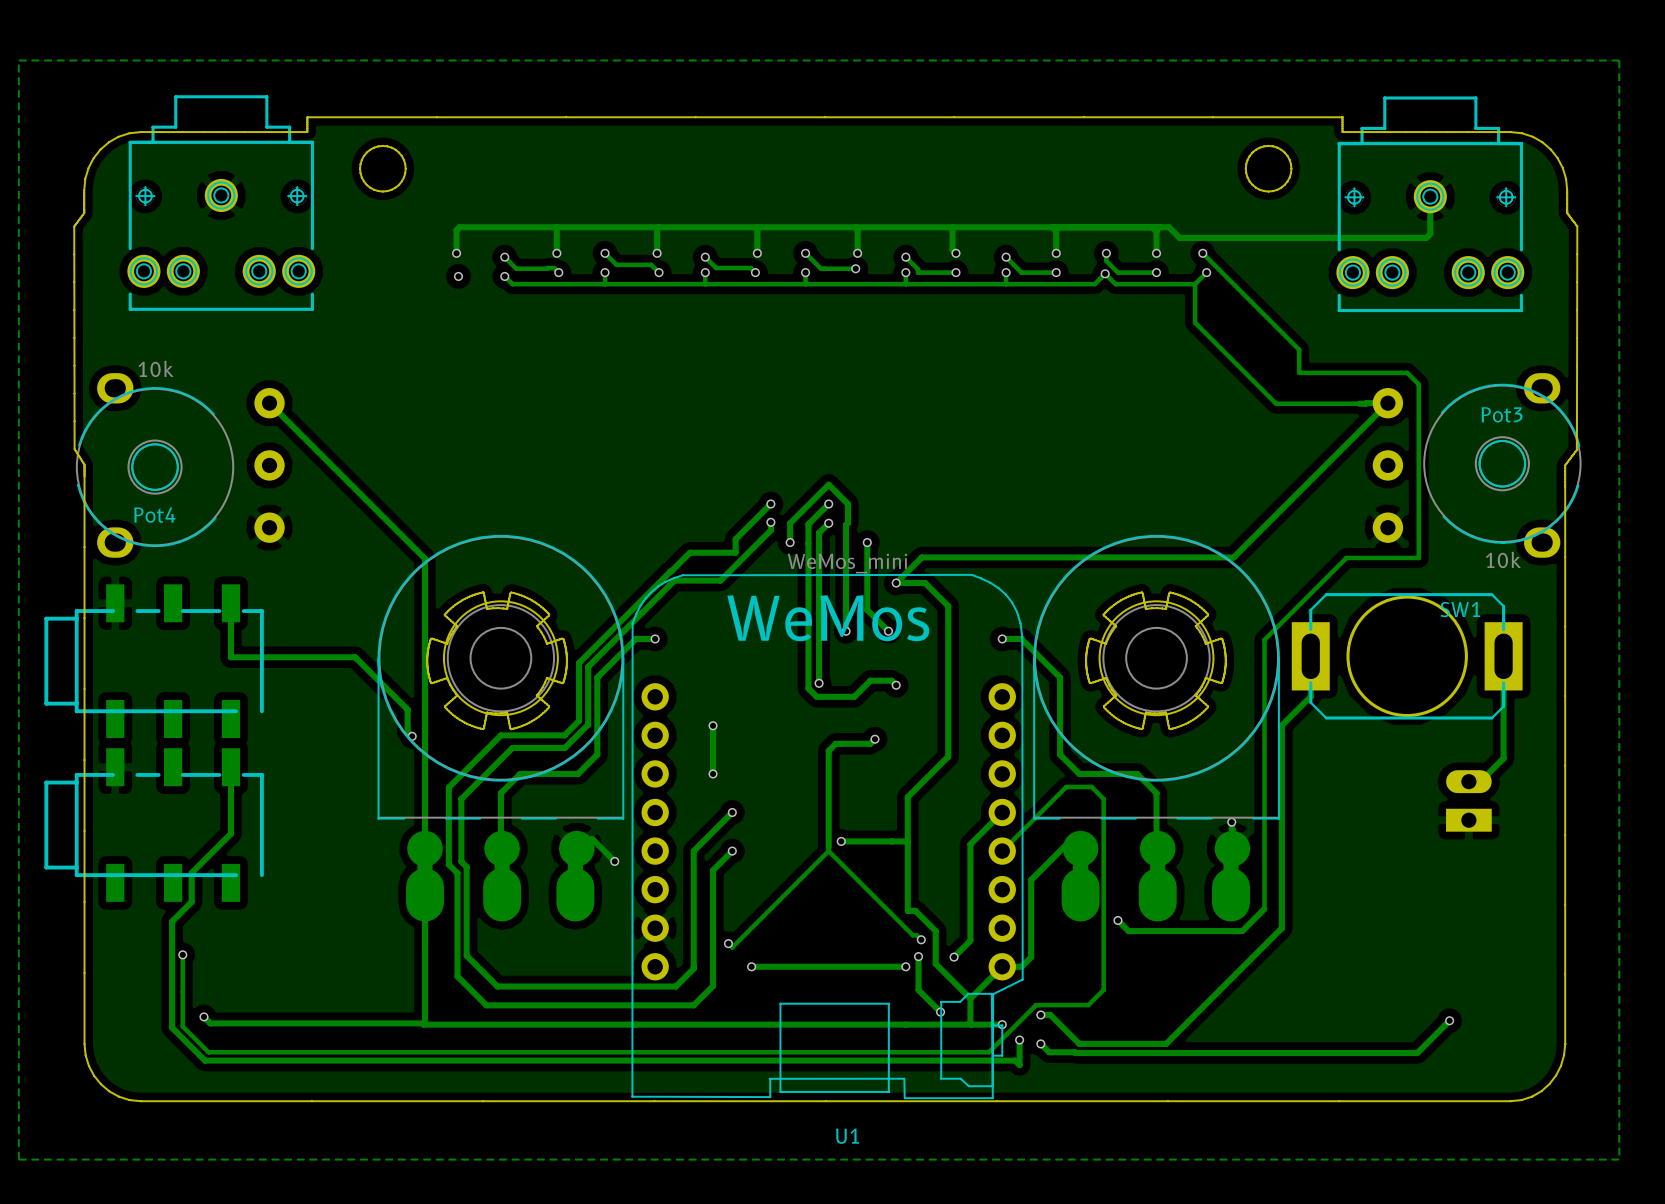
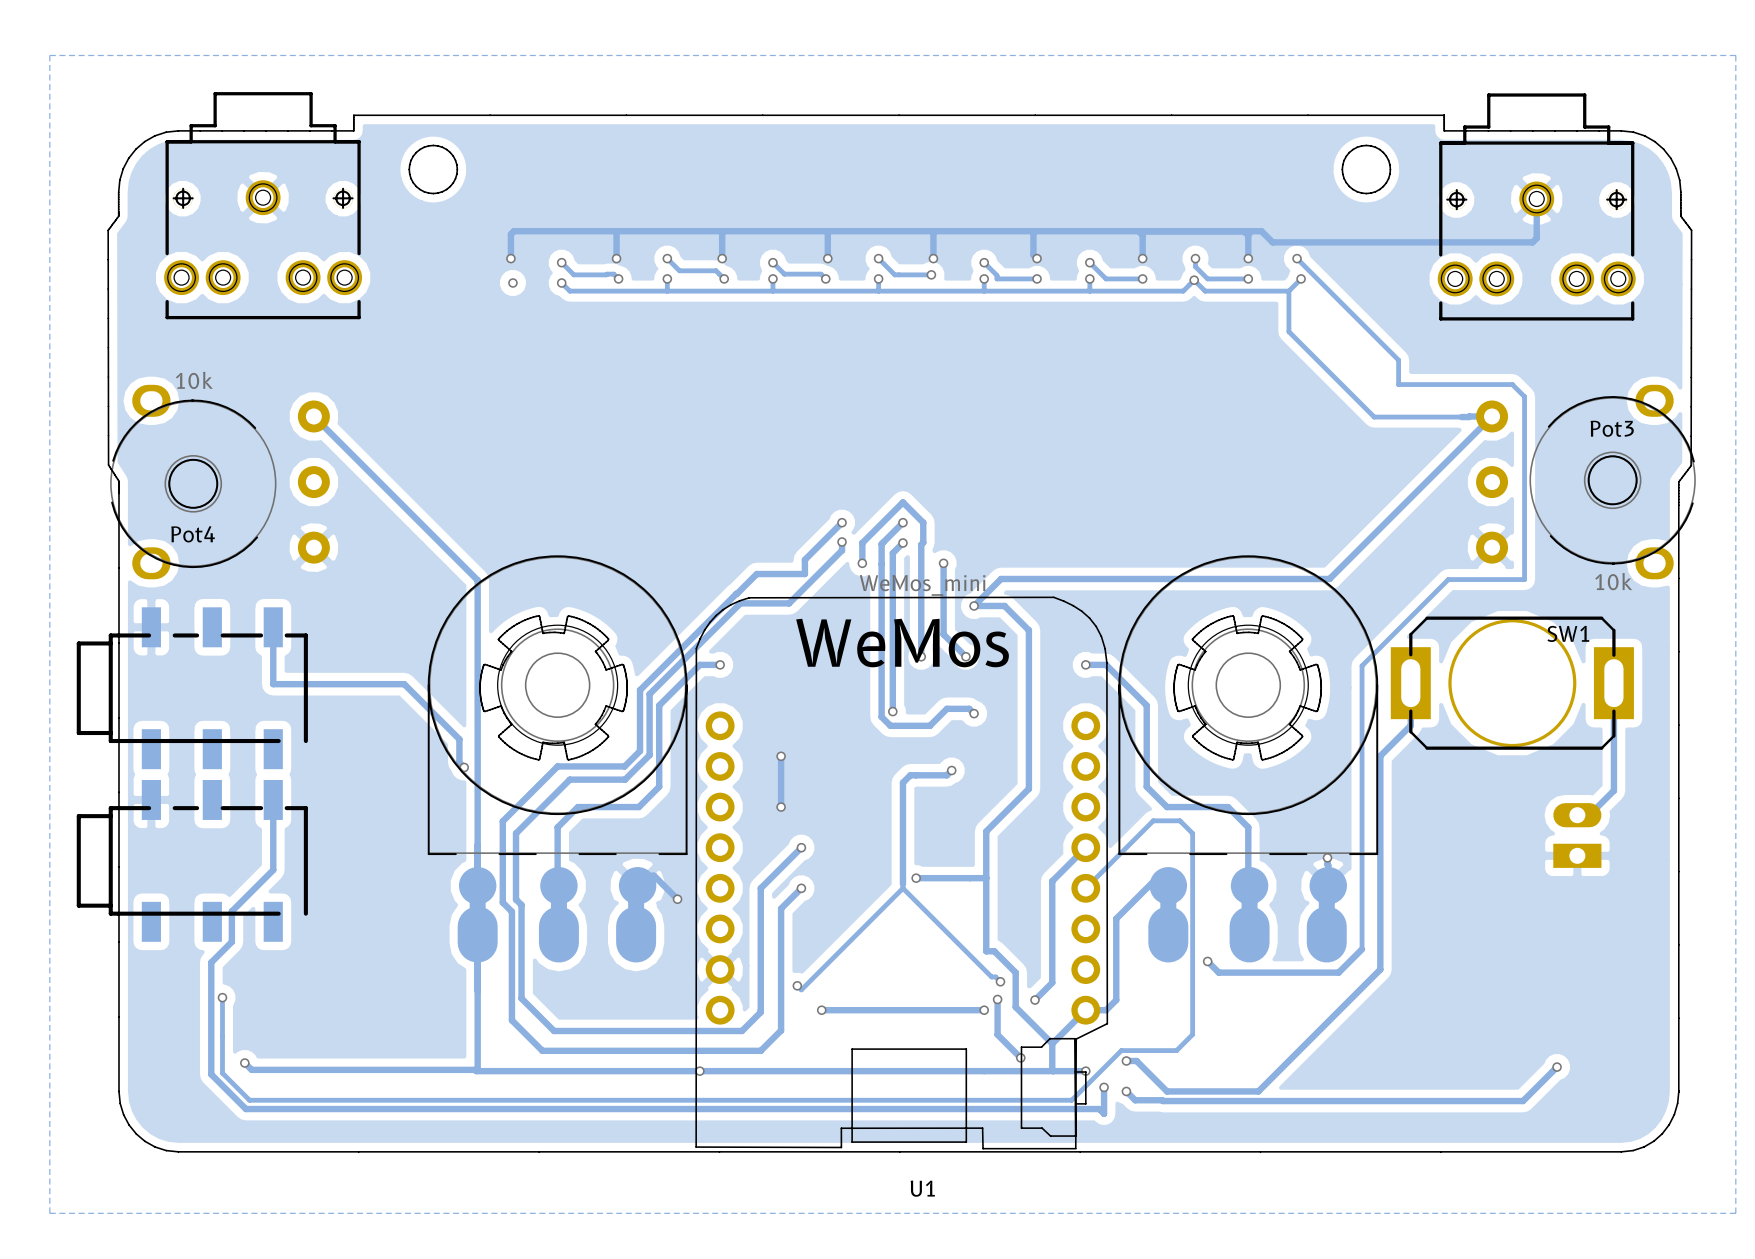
via: none -> (699, 1071)

